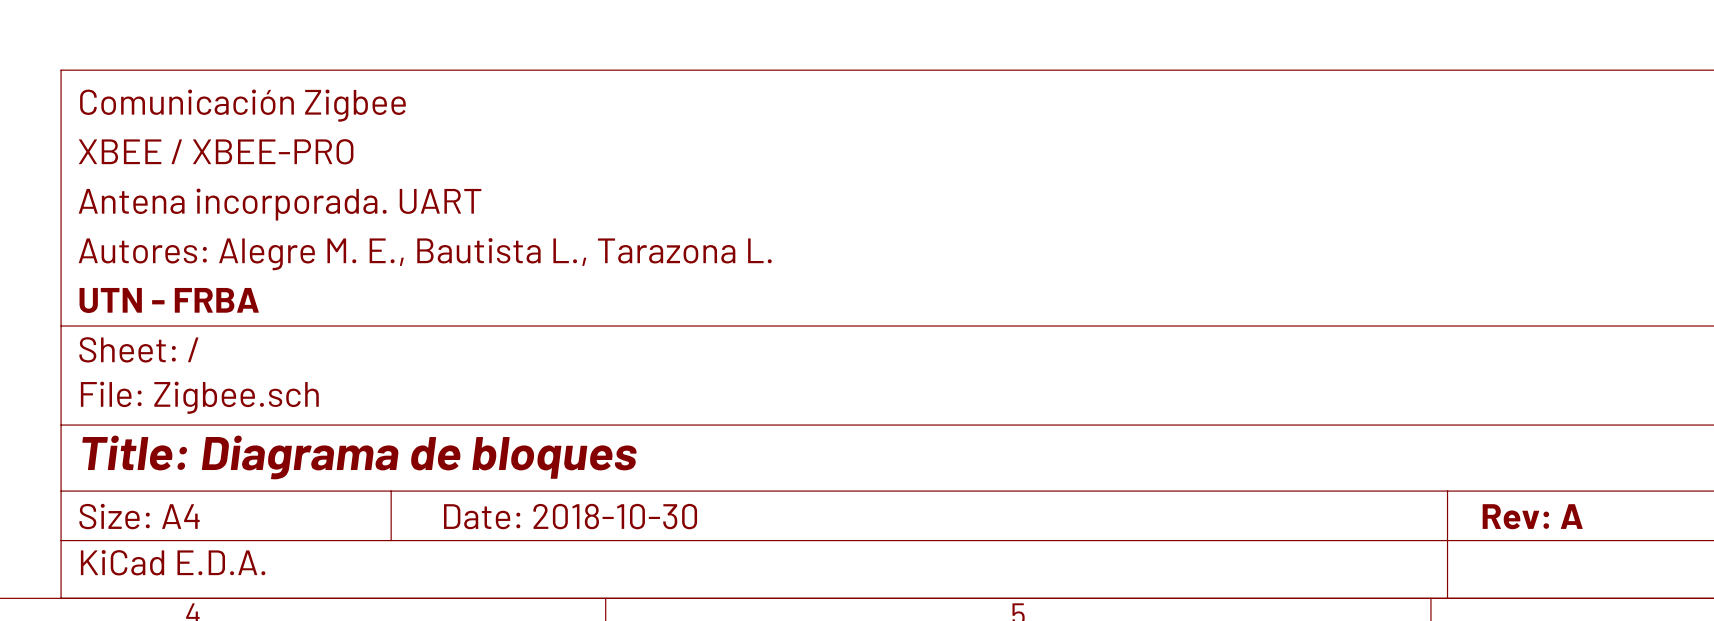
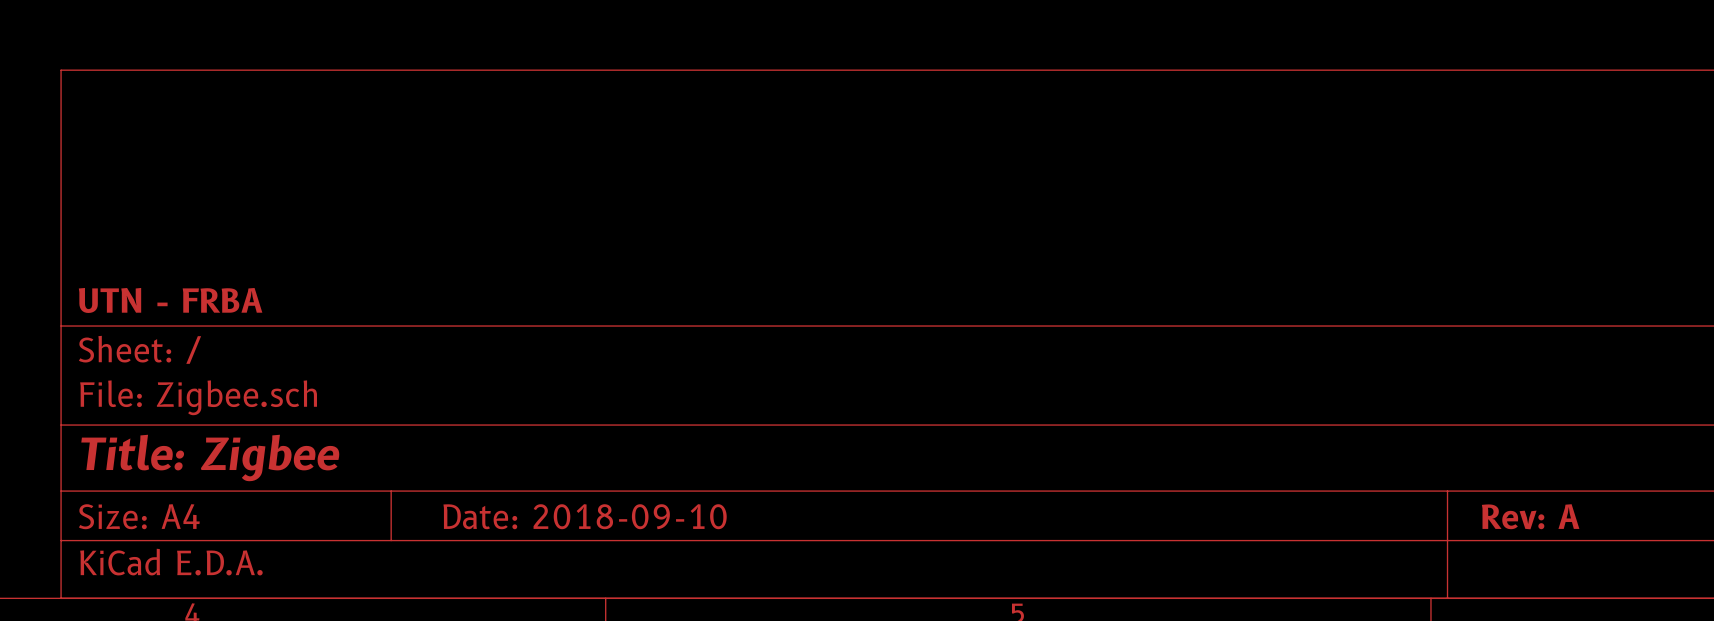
title block: Comunicación Zigbee (242, 105) -> none
title block: XBEE / XBEE-PRO (216, 151) -> none
title block: Antena incorporada. UART (280, 204) -> none
title block: Autores: Alegre M. E., Bautista L., Tarazona L. (425, 254) -> none
title block: Title: Diagrama de bloques (359, 457) -> Title: Zigbee (210, 457)
title block: Date: 2018-10-30 (570, 516) -> Date: 2018-09-10 (585, 516)

